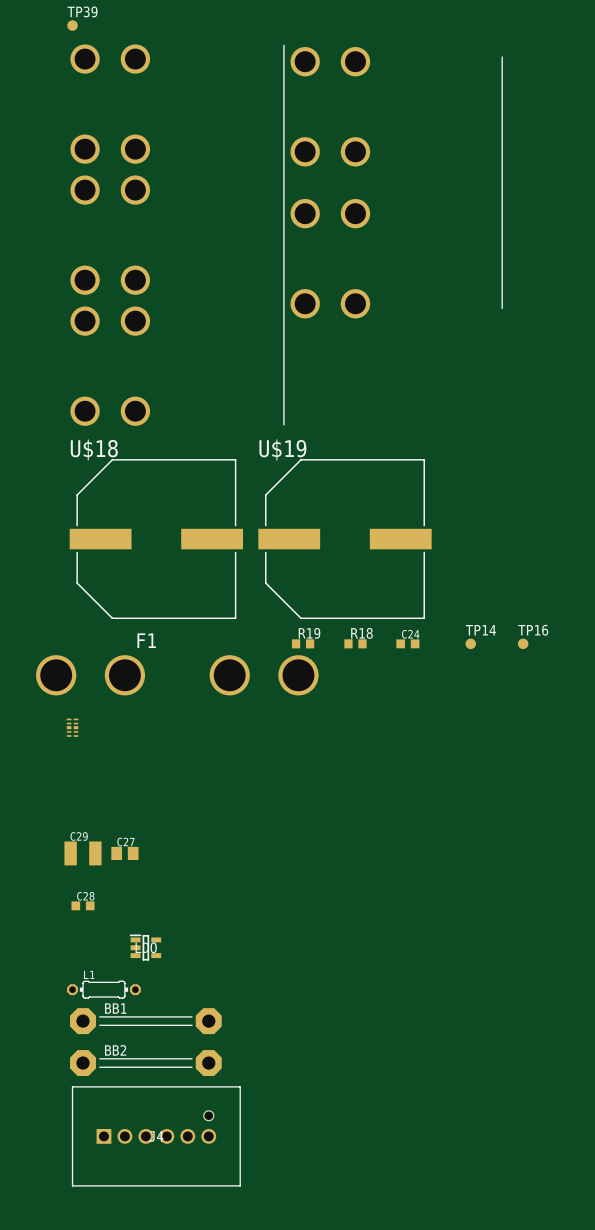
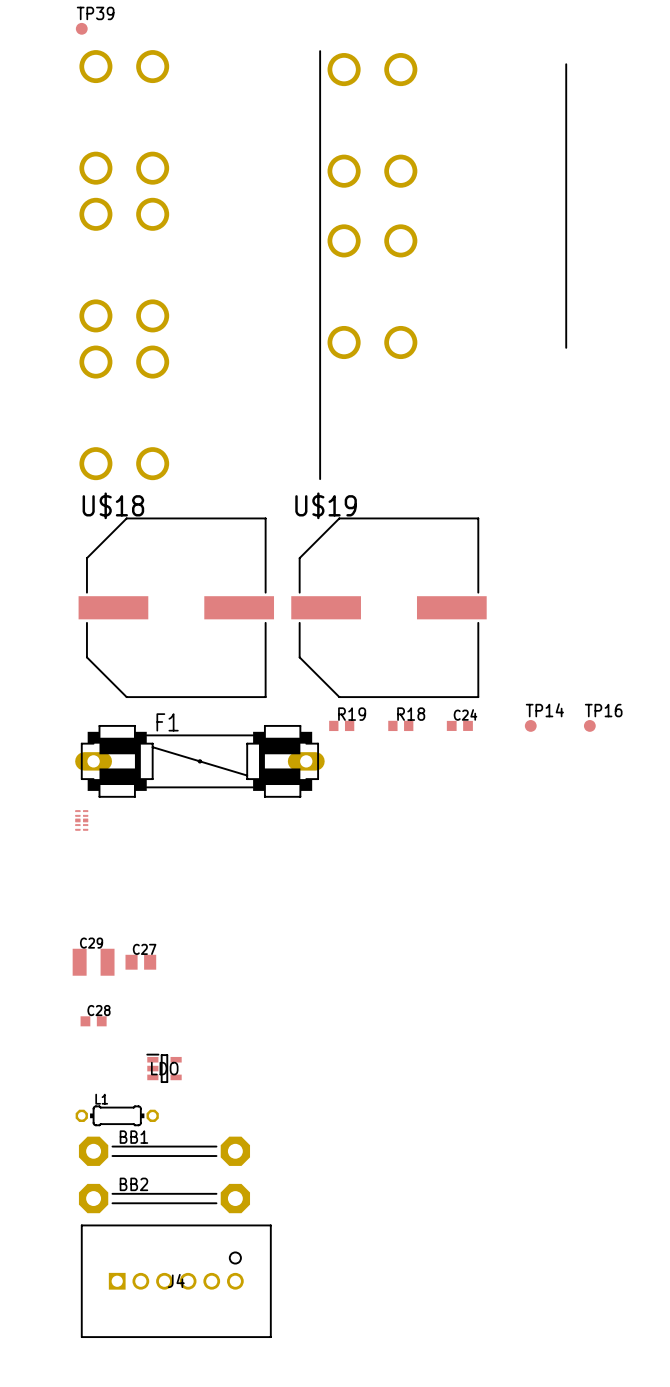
F1 footprint: [36, 655, 319, 696] -> [75, 725, 325, 798]

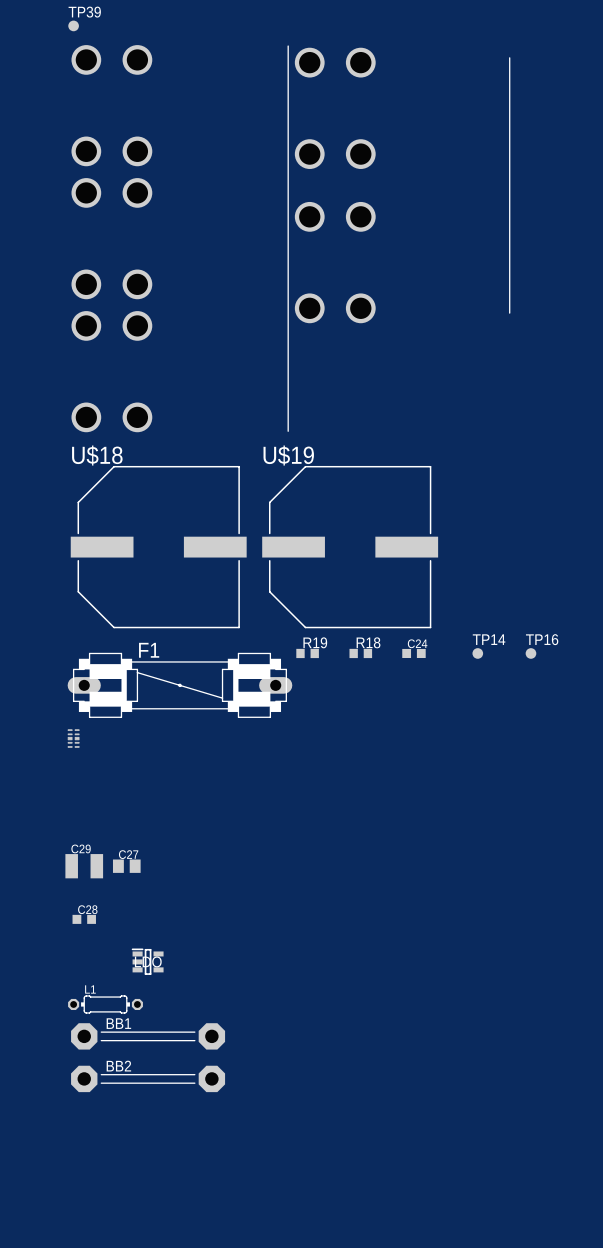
J4: (176, 1281) -> none

